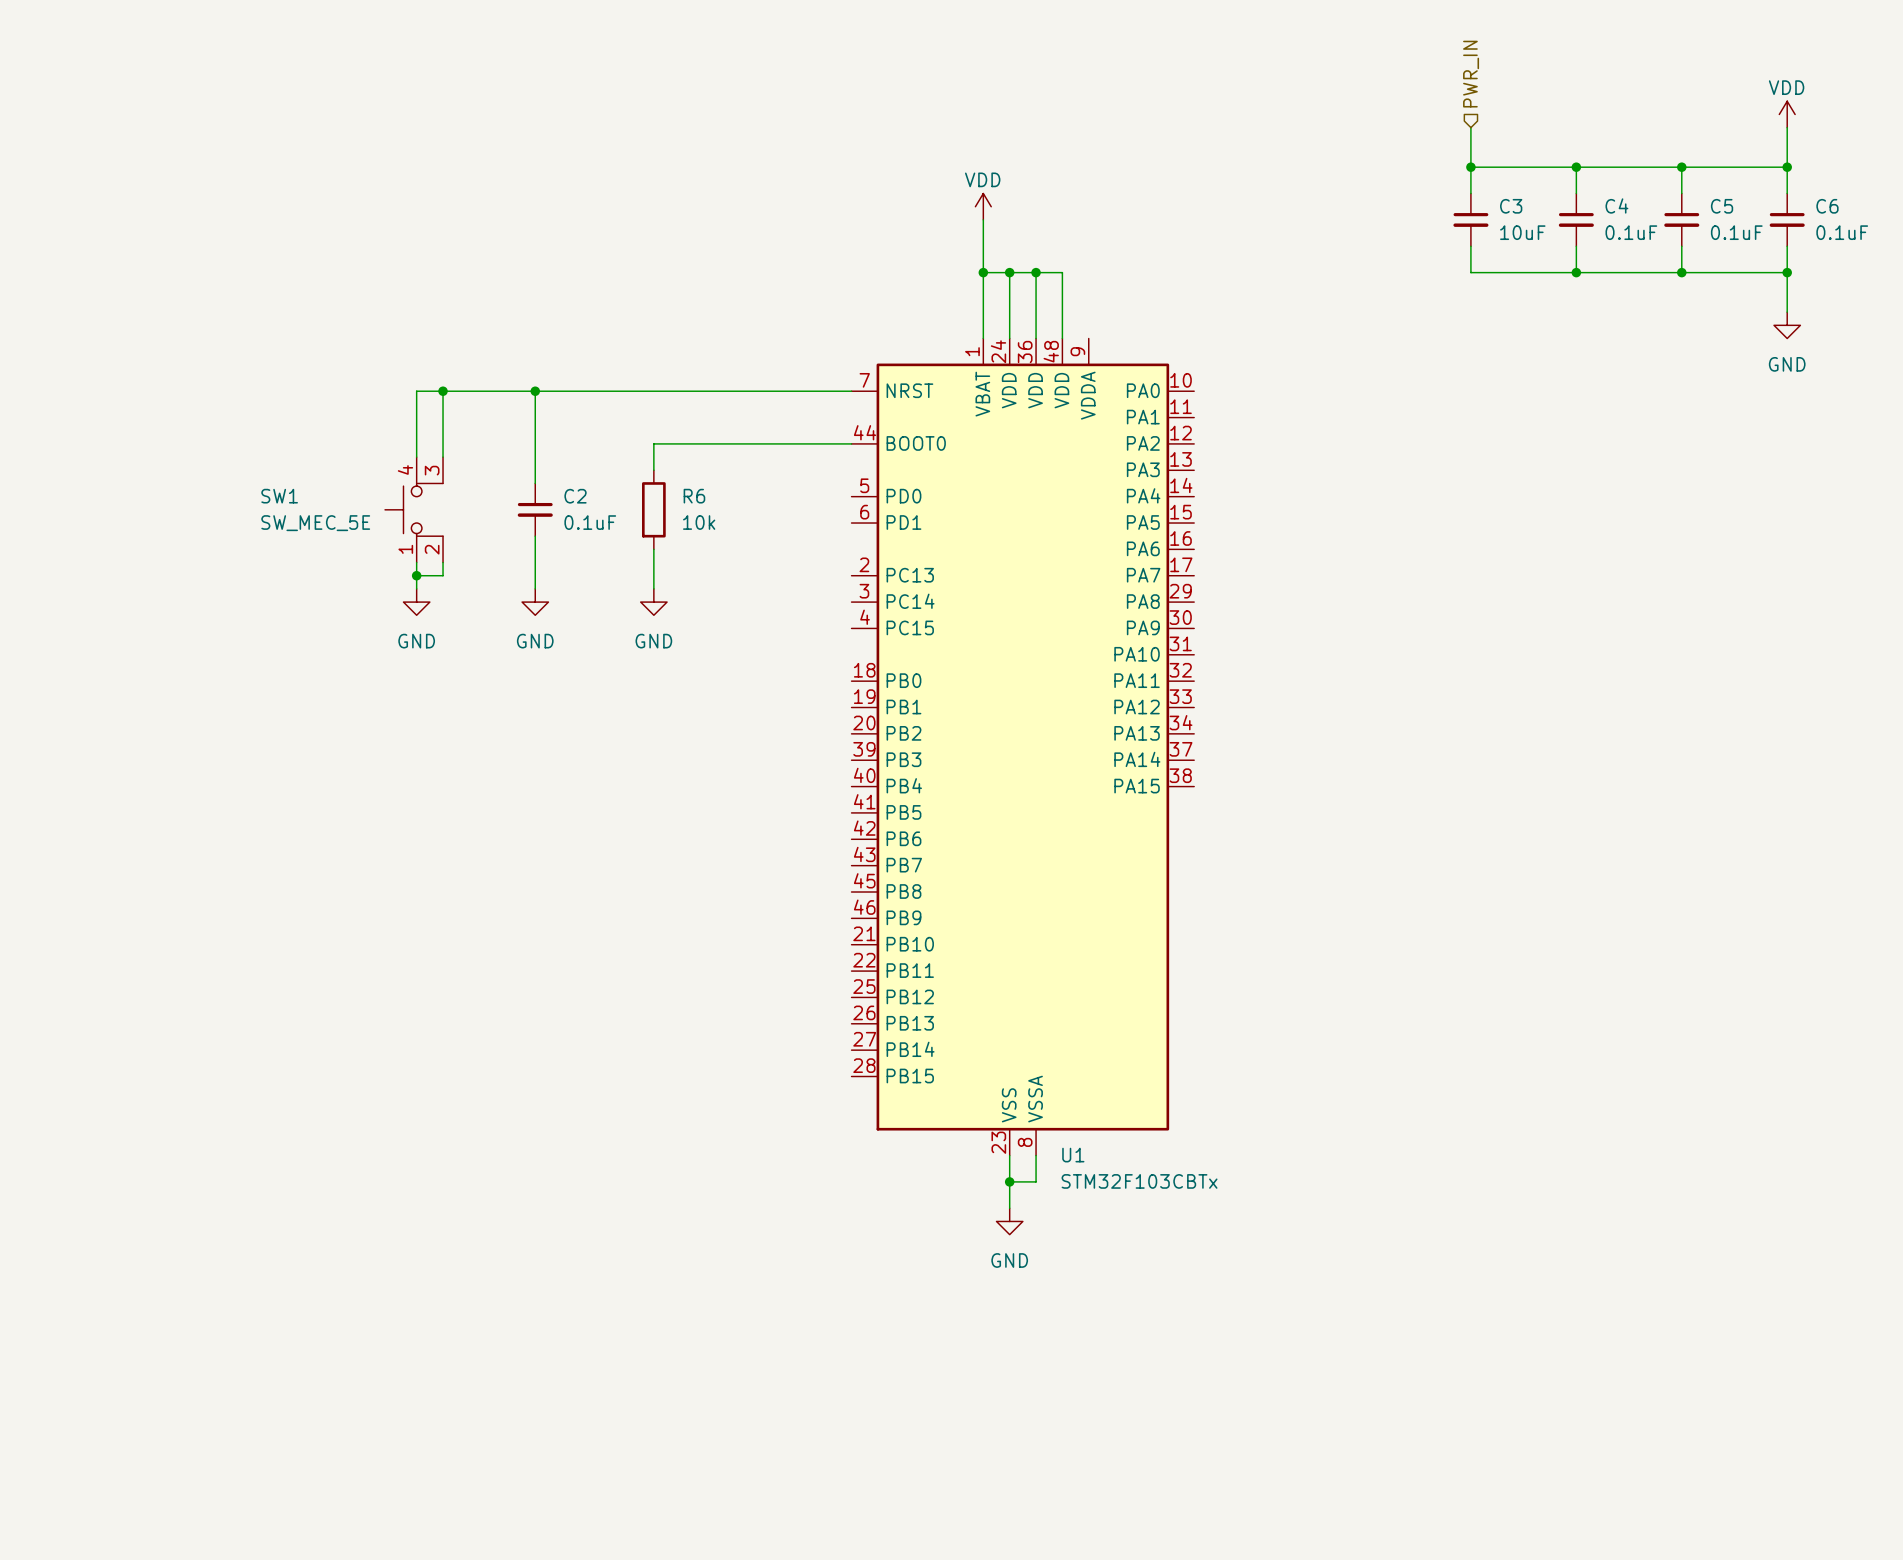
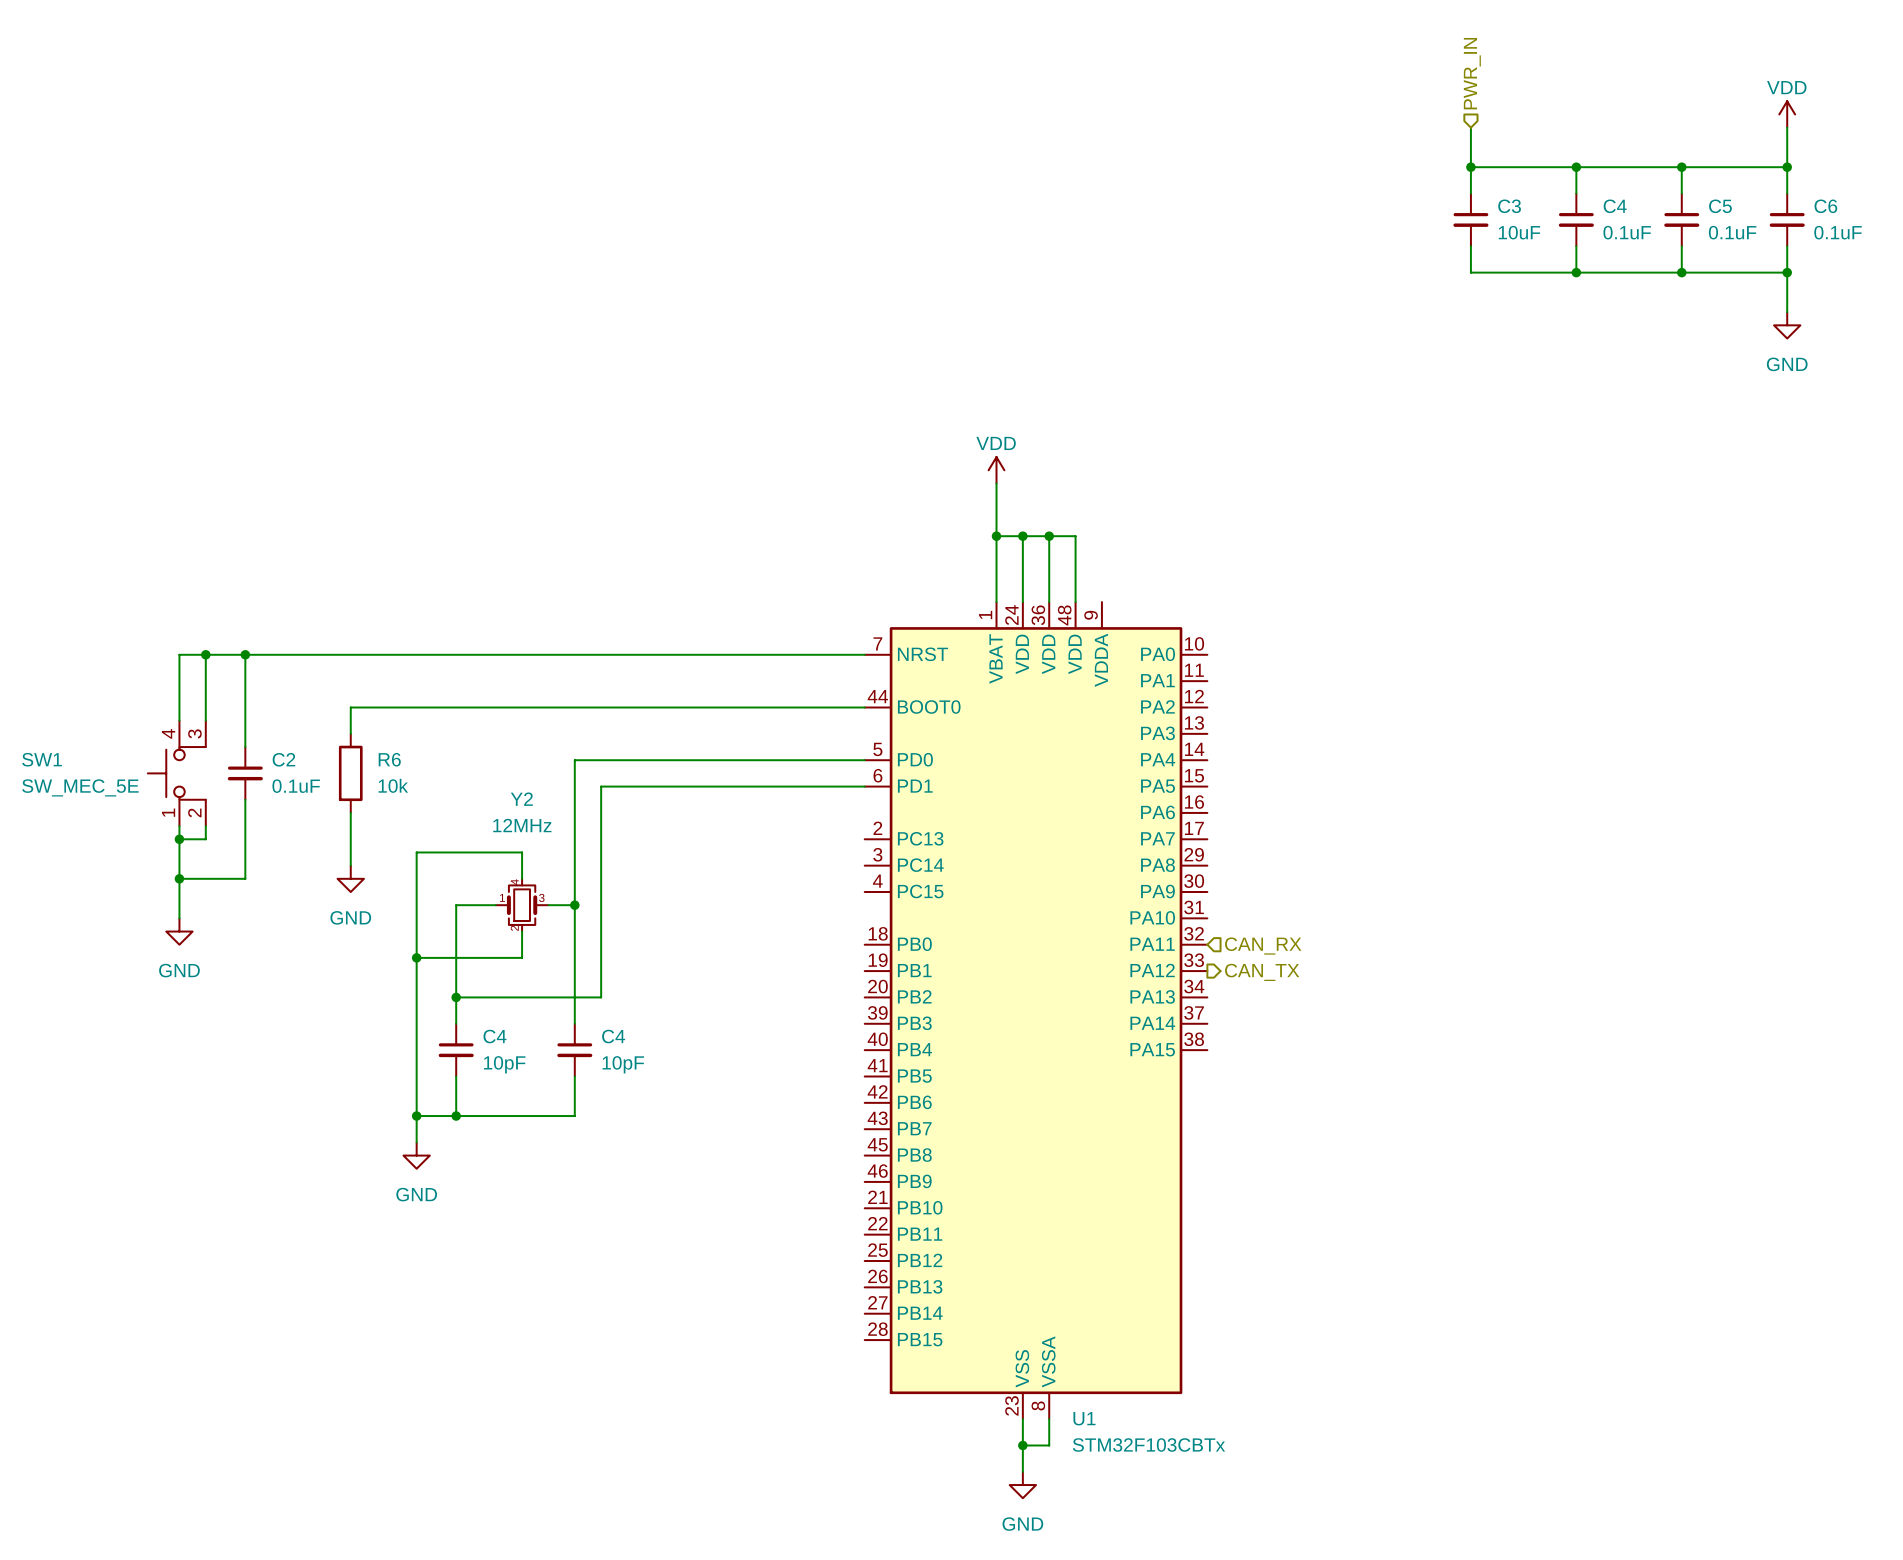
power symbol: VDD (983, 206) -> none
wire: (983, 219) (983, 338) -> none
wire: (983, 272) (1062, 272) (1062, 338) -> none
junction: (983, 272) -> none
wire: (1009, 272) (1009, 338) -> none
junction: (1009, 272) -> none
wire: (1036, 272) (1036, 338) -> none
junction: (1036, 272) -> none
wire: (443, 391) (443, 457) -> none
junction: (443, 391) -> none
wire: (535, 391) (535, 483) -> none
junction: (535, 391) -> none
wire: (851, 391) (416, 391) (416, 457) -> none
wire: (851, 443) (653, 443) (653, 470) -> none
power symbol: none -> VDD (996, 470)
SW1 position: (414, 509) -> (176, 773)
C2 position: (535, 509) -> (245, 773)
R6 position: (653, 509) -> (350, 773)
wire: (535, 536) (535, 588) -> none
junction: none -> (996, 536)
junction: none -> (1022, 536)
junction: none -> (1049, 536)
wire: (653, 549) (653, 588) -> none
wire: (416, 562) (416, 588) -> none
wire: (443, 562) (443, 575) (416, 575) -> none
junction: (416, 575) -> none
power symbol: GND (416, 602) -> none
power symbol: GND (535, 602) -> none
power symbol: GND (653, 602) -> none
wire: none -> (205, 654) (205, 720)
junction: none -> (205, 654)
wire: none -> (245, 654) (245, 747)
junction: none -> (245, 654)
wire: none -> (864, 654) (179, 654) (179, 720)
wire: none -> (864, 707) (350, 707) (350, 733)
U1 position: (1022, 747) -> (1036, 1010)
wire: none -> (864, 760) (574, 760) (574, 1023)
wire: none -> (864, 786) (601, 786) (601, 997) (456, 997)
wire: none -> (245, 799) (245, 878) (179, 878)
wire: none -> (350, 812) (350, 865)
wire: none -> (179, 826) (179, 918)
wire: none -> (205, 826) (205, 839) (179, 839)
junction: none -> (179, 839)
junction: none -> (179, 878)
power symbol: none -> GND (350, 878)
wire: none -> (522, 878) (522, 852) (416, 852) (416, 1142)
wire: none -> (495, 905) (456, 905) (456, 1023)
Y2: none -> 12MHz (522, 905)
wire: none -> (548, 905) (574, 905)
junction: none -> (574, 905)
power symbol: none -> GND (179, 931)
wire: none -> (522, 931) (522, 957) (416, 957)
hierarchical label: none -> CAN_RX (1263, 946)
junction: none -> (416, 957)
hierarchical label: none -> CAN_TX (1262, 972)
junction: none -> (456, 997)
C4: none -> 10pF (456, 1050)
C4: none -> 10pF (574, 1050)
wire: none -> (456, 1076) (456, 1116)
wire: none -> (574, 1076) (574, 1116) (416, 1116)
junction: none -> (416, 1116)
junction: none -> (456, 1116)
power symbol: none -> GND (416, 1155)
junction: (1009, 1181) -> none
power symbol: GND (1009, 1221) -> none
wire: none -> (1022, 1419) (1022, 1471)
wire: none -> (1049, 1419) (1049, 1445) (1022, 1445)
junction: none -> (1022, 1445)
power symbol: none -> GND (1022, 1485)

